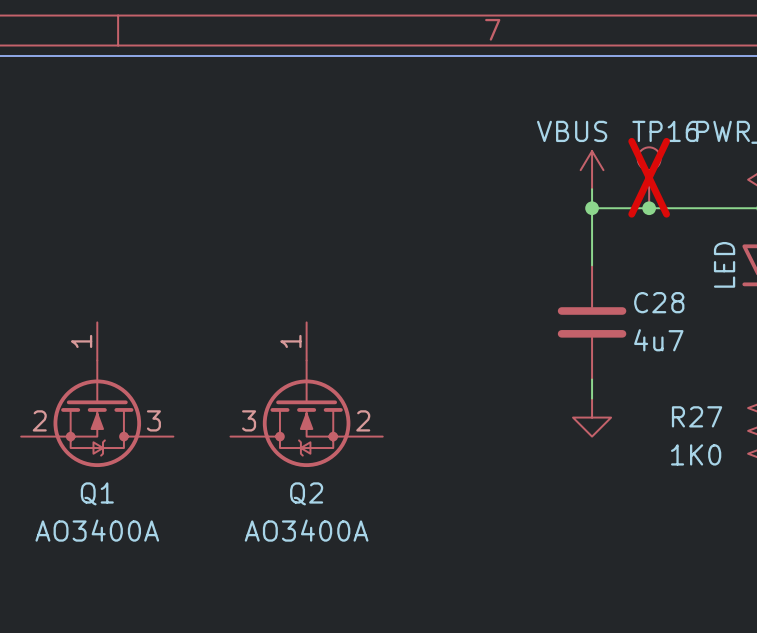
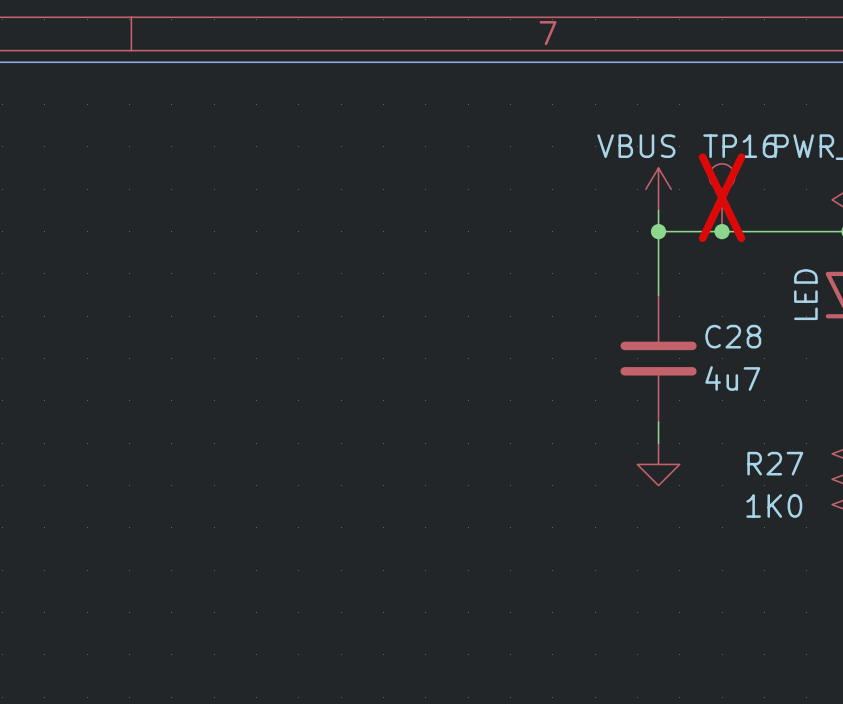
Q1: AO3400A (97, 394) -> none
Q2: AO3400A (306, 394) -> none

